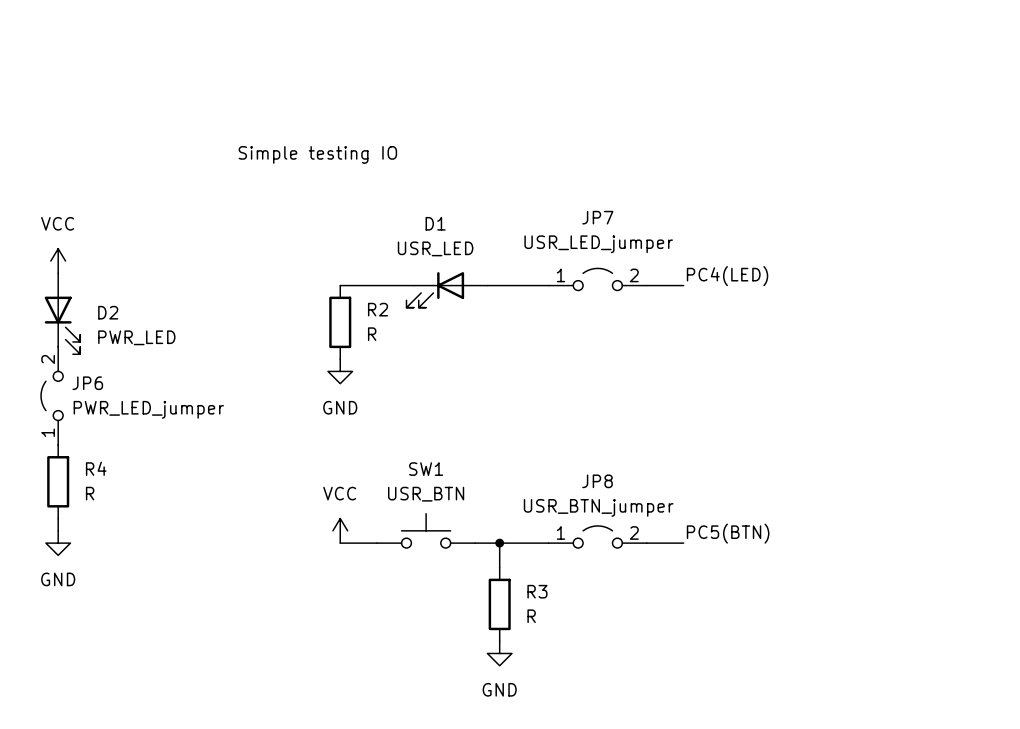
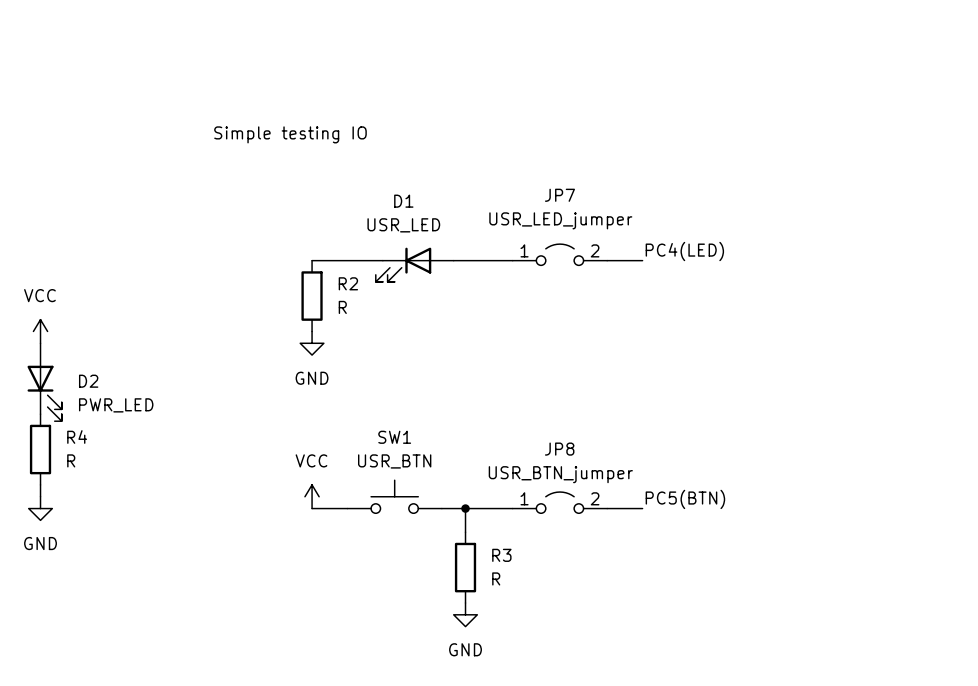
power symbol position: VCC (58, 261) -> VCC (40, 331)
D2 position: (62, 313) -> (44, 382)
JP6: PWR_LED_jumper (52, 395) -> none

